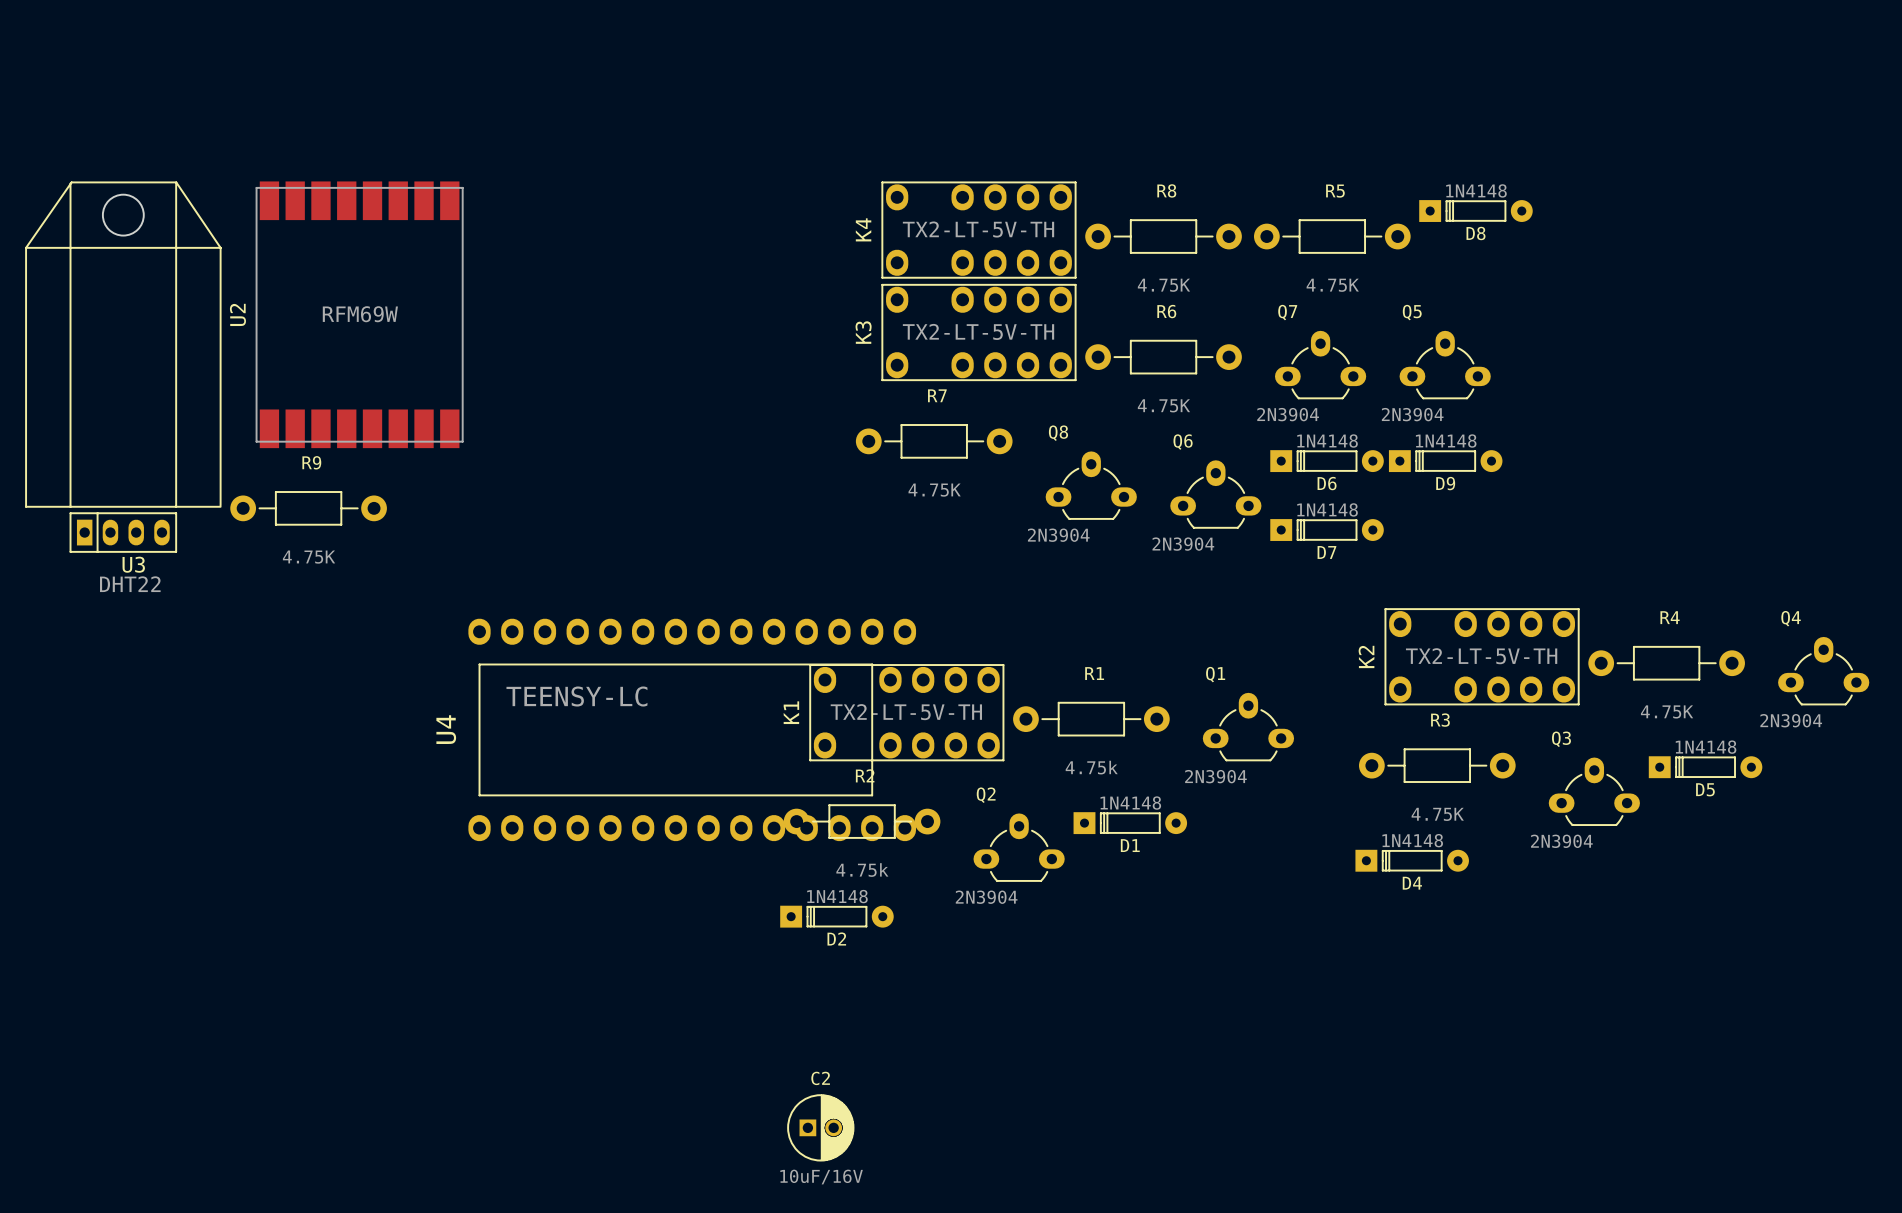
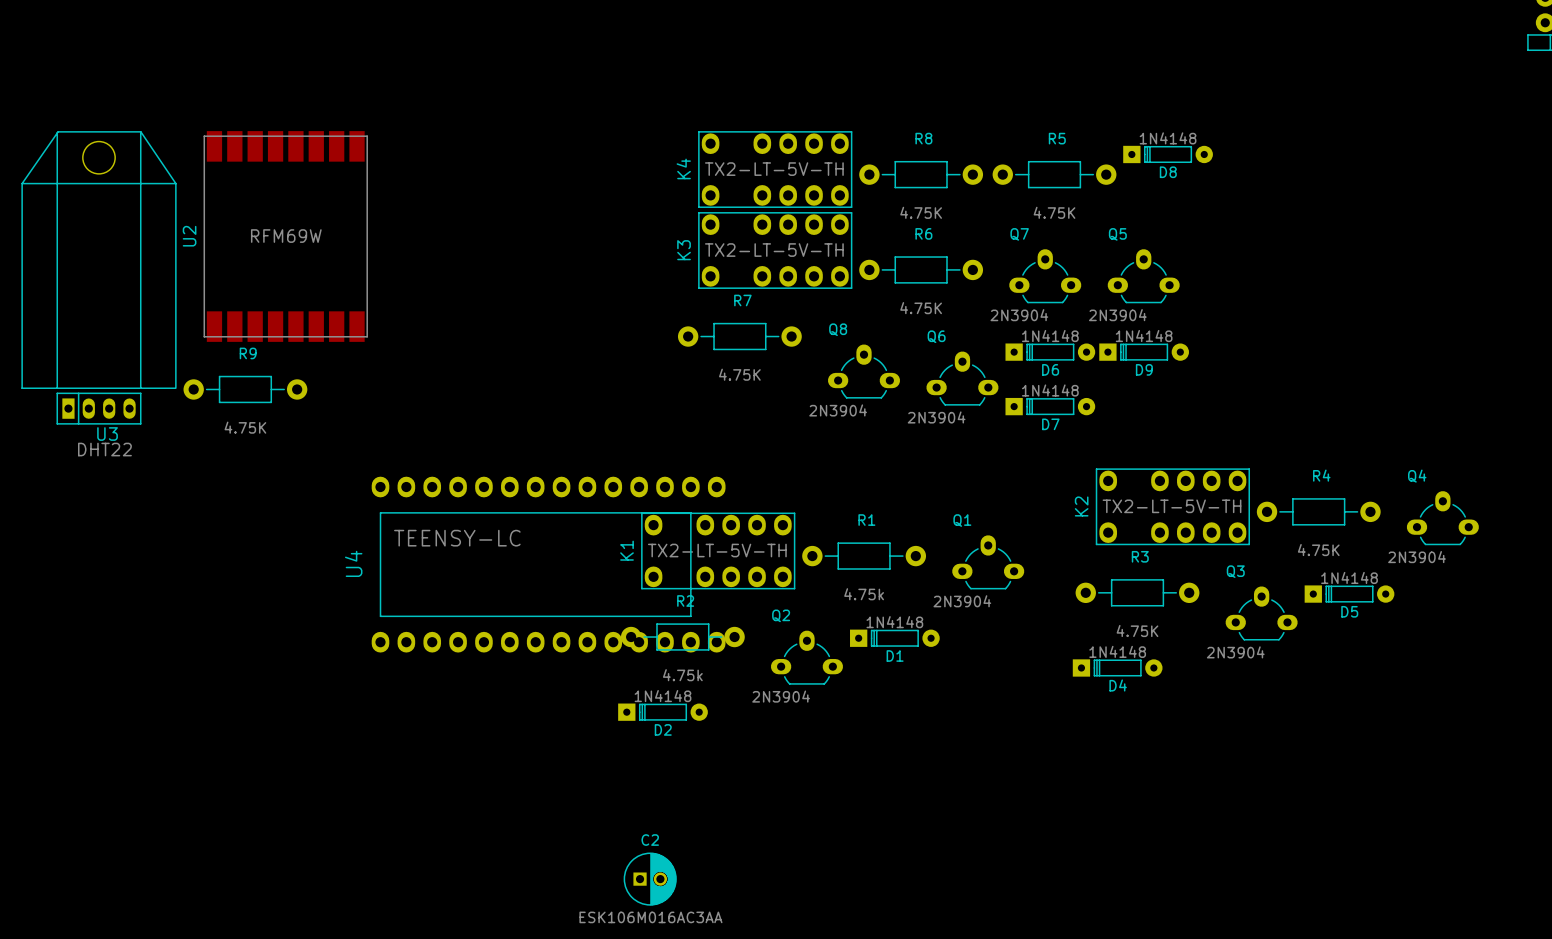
C2 value: 10uF/16V (821, 1177) -> ESK106M016AC3AA (650, 917)

